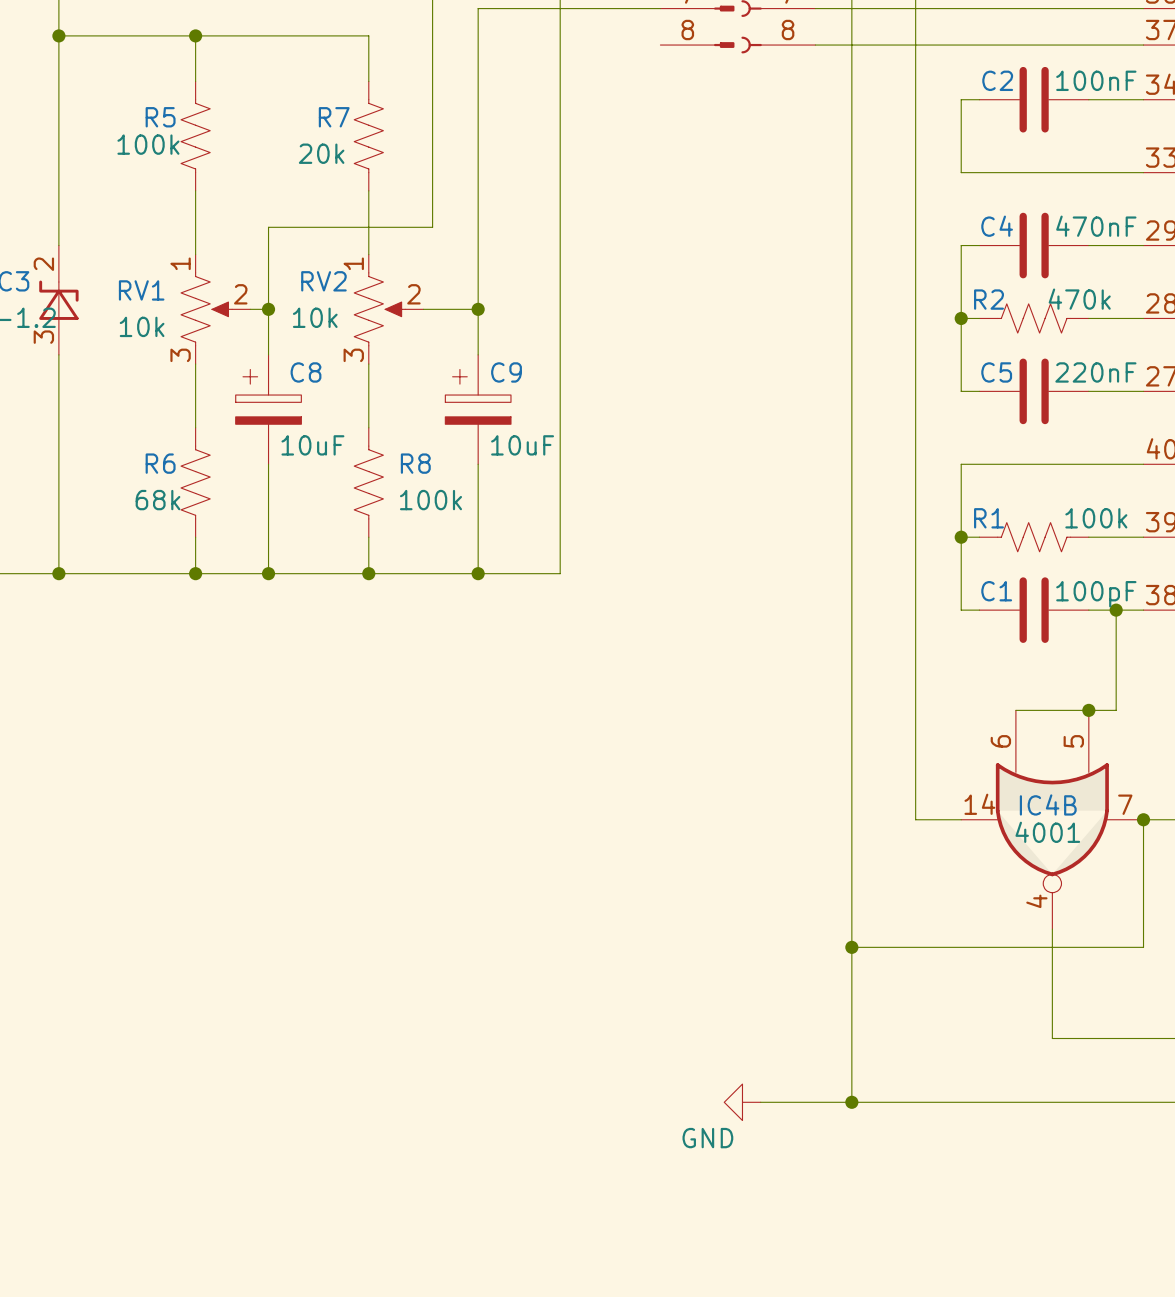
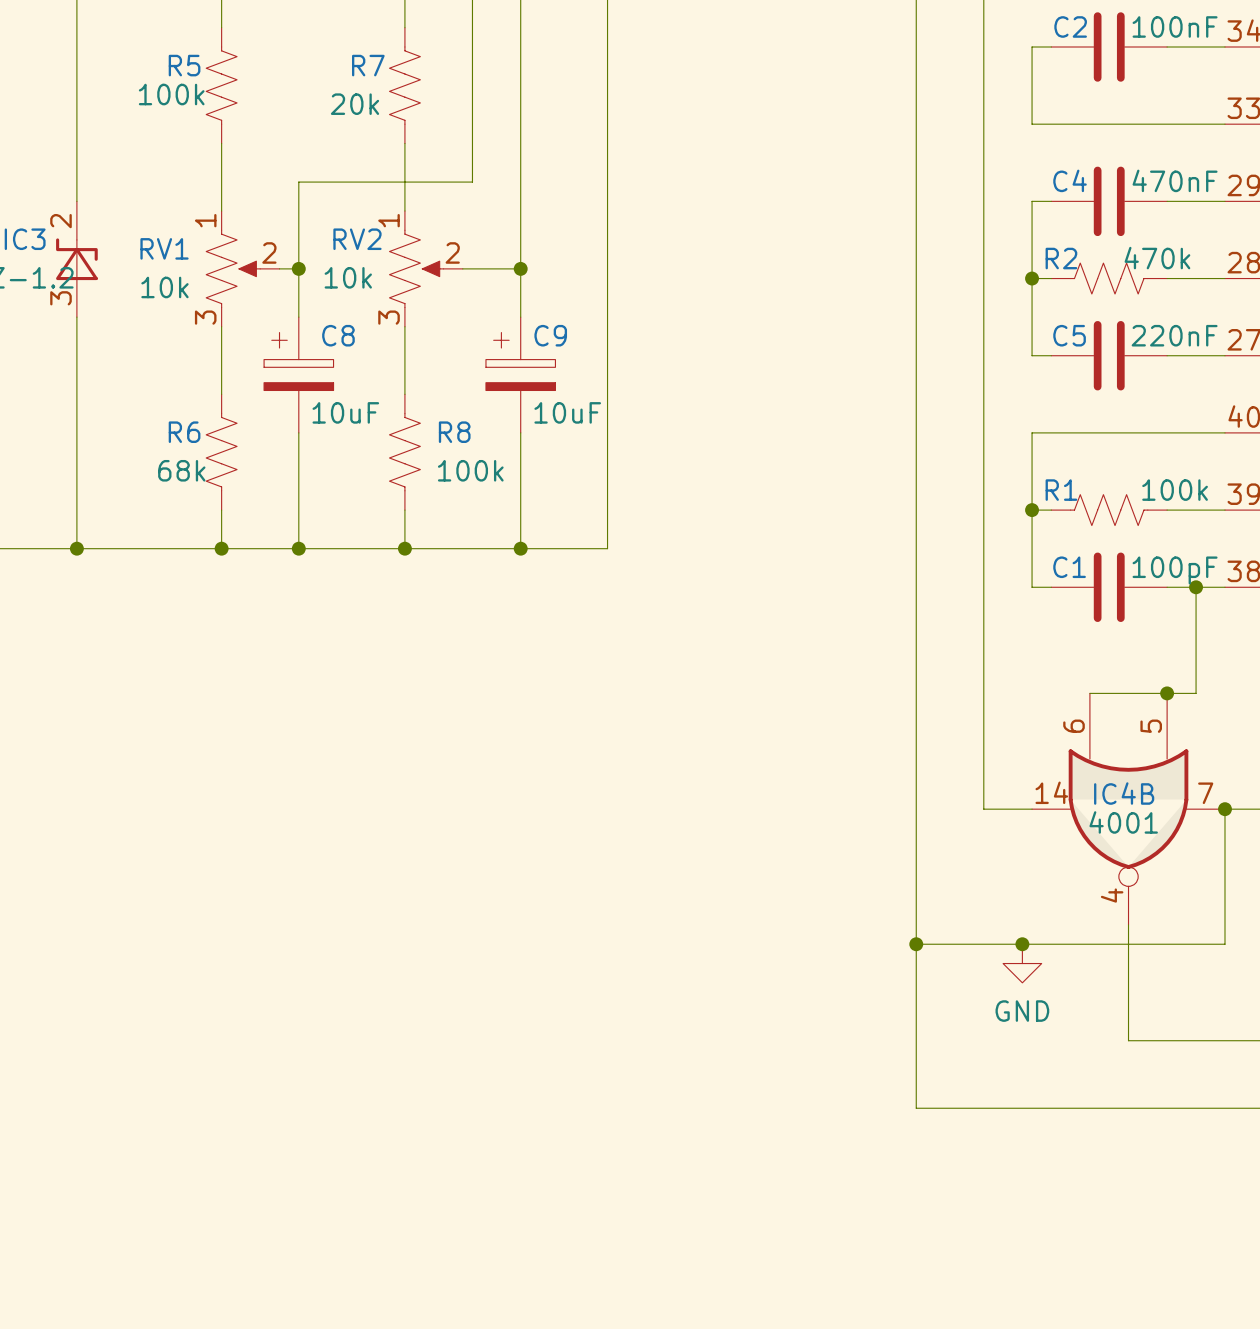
junction: none -> (1022, 944)
power symbol rotation: 0° (742, 1102) -> 90° counterclockwise (1022, 963)
power symbol position: GND (742, 1102) -> GND (1022, 963)
wire: (760, 1102) (851, 1102) -> none
junction: (851, 1102) -> none
power symbol text position: GND (707, 1138) -> GND (1022, 1011)

